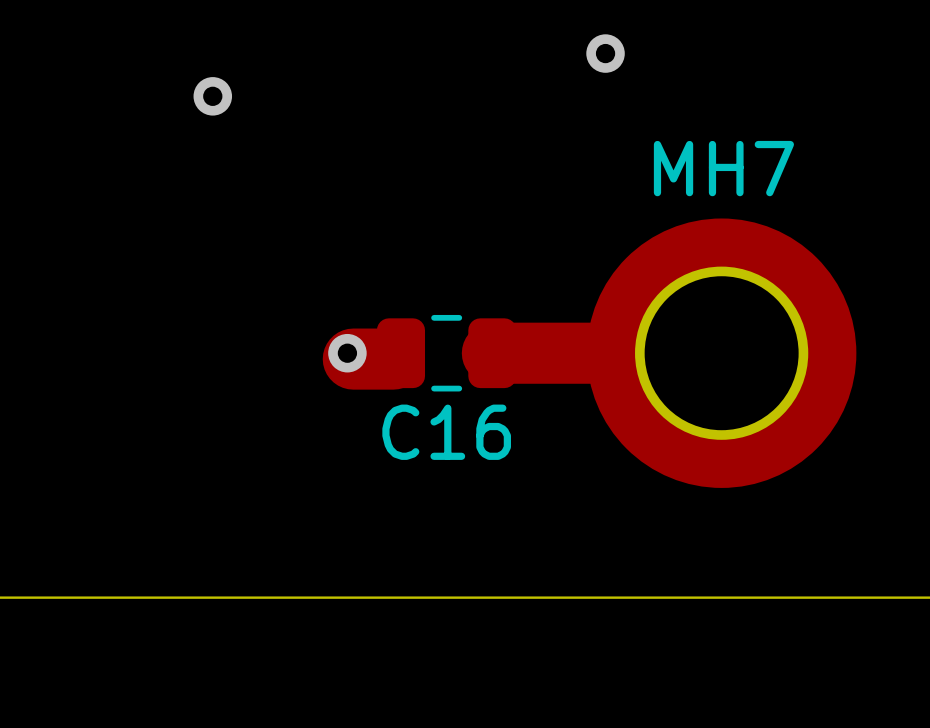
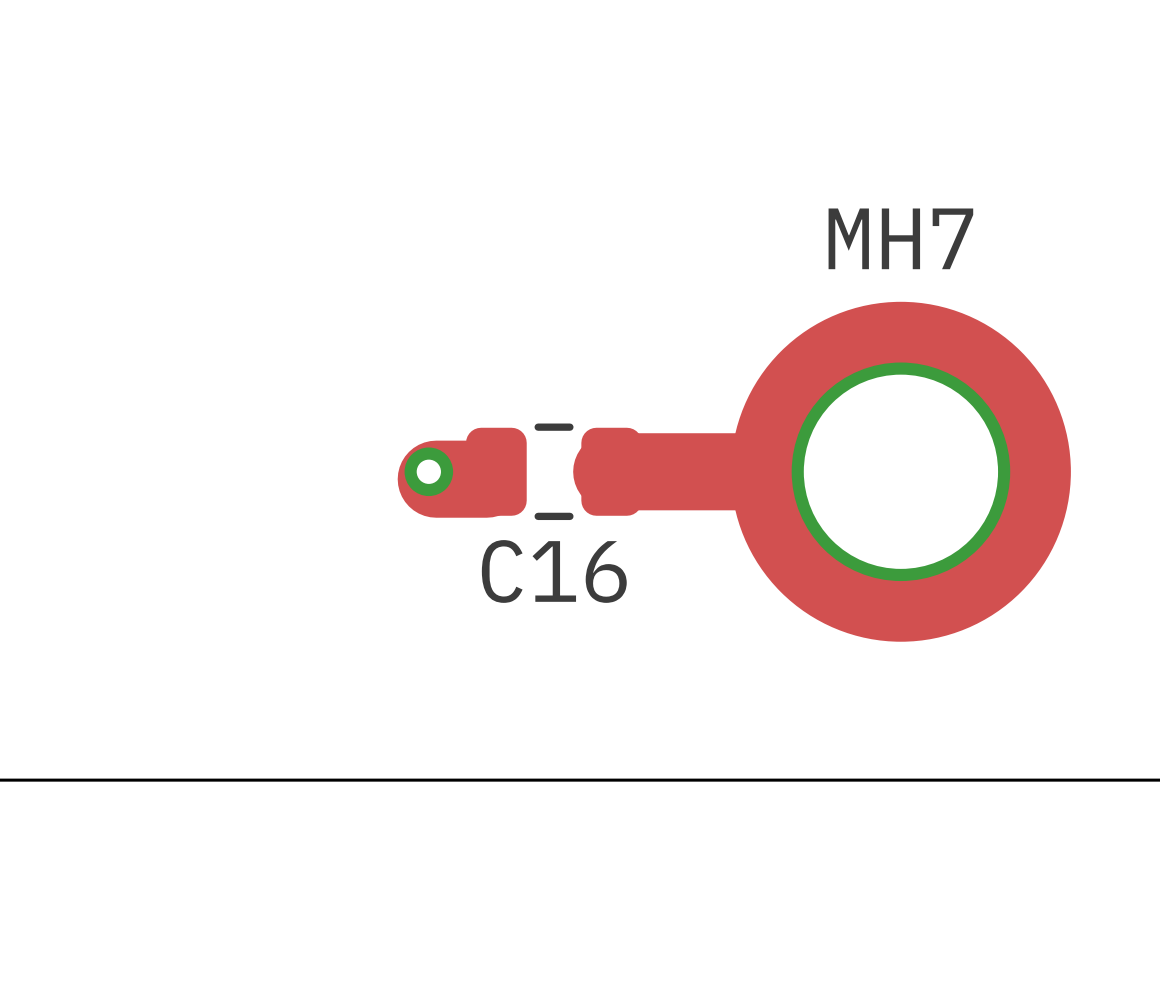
via: (605, 53) -> none
via: (212, 96) -> none

